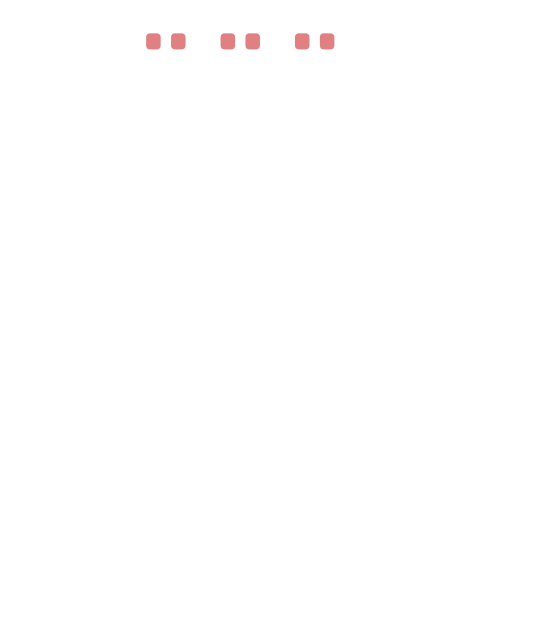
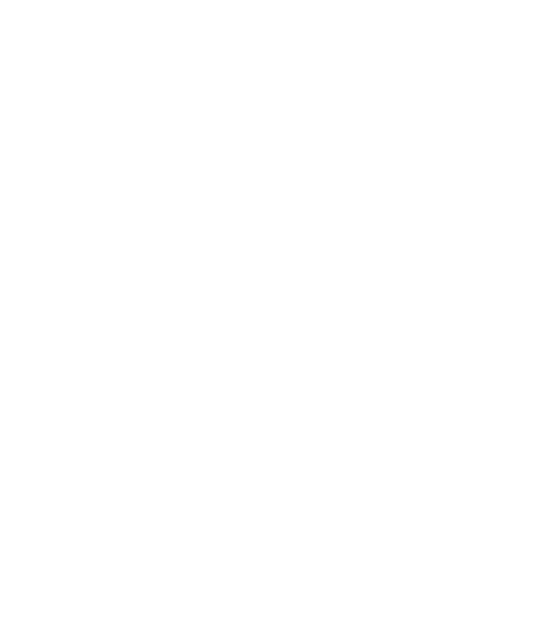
part: (165, 41) -> none
part: (240, 41) -> none
part: (314, 41) -> none

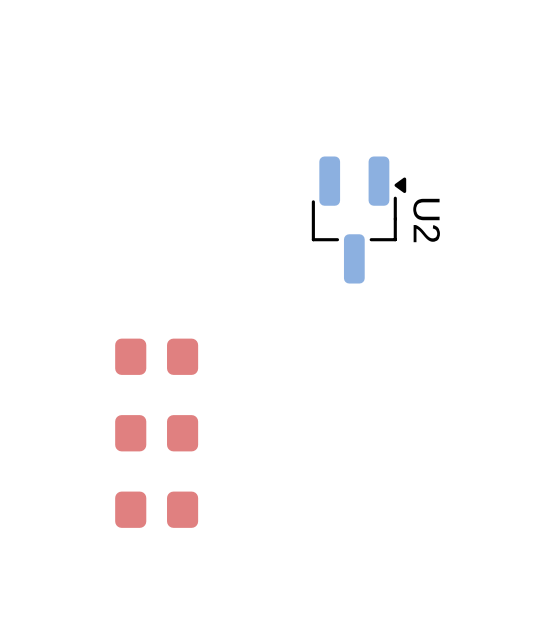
U2: none -> (359, 220)
part: none -> (156, 356)
part: none -> (156, 433)
part: none -> (156, 509)

